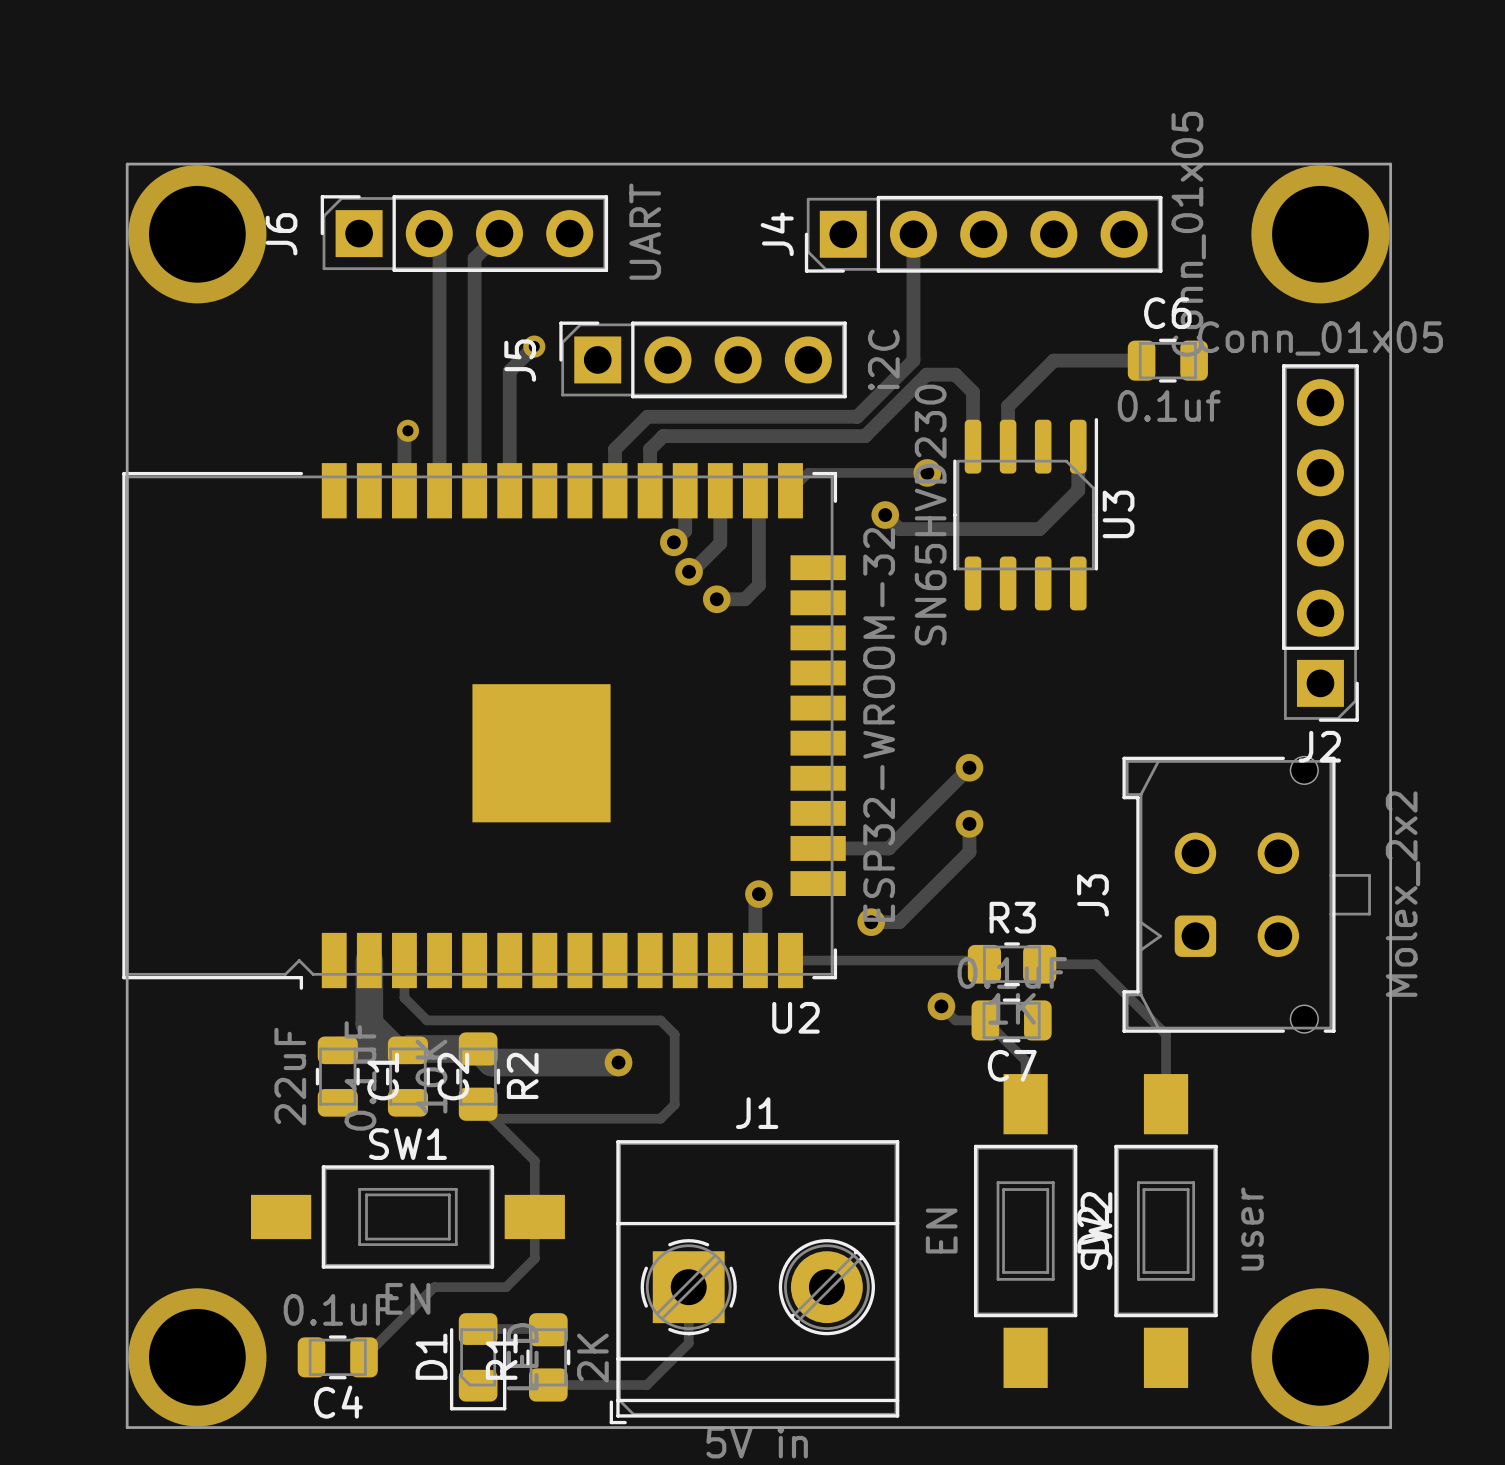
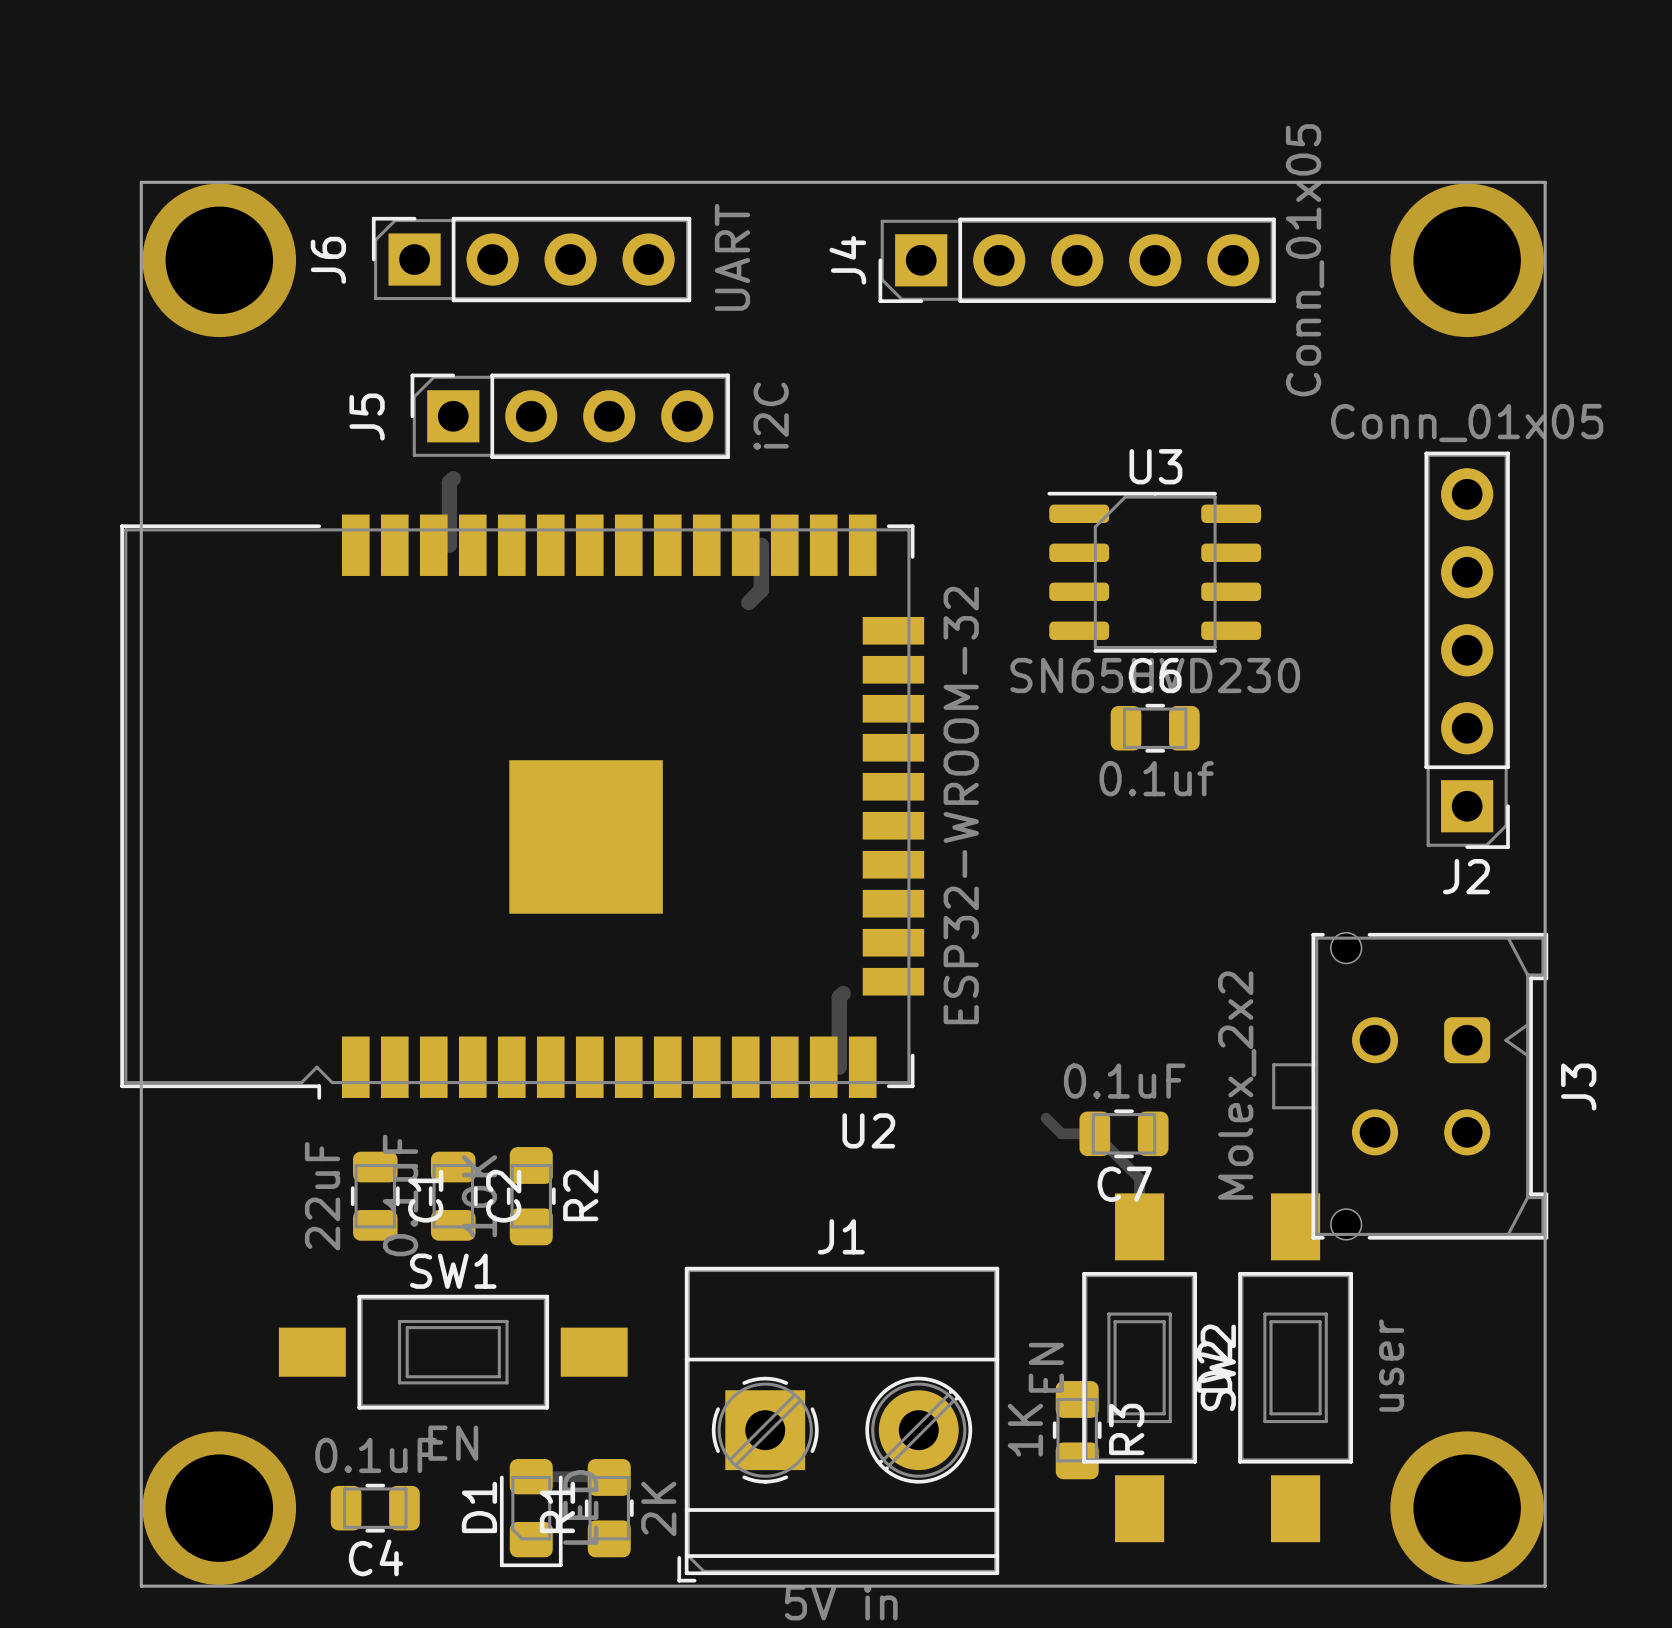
track: (429, 233) (439, 243) (439, 490) -> none
J6 position: (464, 233) -> (531, 259)
track: (499, 233) (474, 258) (474, 490) -> none
track: (913, 234) (913, 360) (857, 416) (647, 416) (615, 449) (615, 490) -> none
J4 position: (983, 234) -> (1077, 260)
track: (534, 346) (509, 371) (509, 490) -> none
via: (534, 346) -> none
J5 position: (703, 359) -> (570, 416)
track: (1141, 360) (1053, 360) (1008, 406) (1008, 446) -> none
C6 position: (1167, 360) -> (1155, 728)
via: (407, 430) -> none
track: (973, 446) (973, 392) (955, 374) (926, 374) (865, 436) (663, 436) (650, 449) (650, 490) -> none
track: (1078, 446) (1078, 490) (1039, 529) (899, 529) (885, 515) -> none
track: (927, 472) (808, 472) (790, 490) -> none
via: (927, 472) -> none
track: (720, 490) (720, 543) (691, 571) (689, 571) -> none
track: (755, 490) (758, 494) (758, 585) (744, 599) (716, 599) -> none
U3 rotation: 0° (1025, 514) -> 90° counterclockwise (1154, 572)
via: (885, 515) -> none
via: (673, 542) -> none
J2 position: (1320, 542) -> (1467, 650)
via: (689, 571) -> none
via: (716, 599) -> none
U2 position: (484, 726) -> (522, 807)
track: (969, 767) (888, 848) (818, 848) -> none
via: (969, 767) -> none
track: (969, 823) (969, 851) (899, 922) (871, 922) -> none
via: (969, 823) -> none
via: (758, 894) -> none
J3 rotation: 0° (1246, 894) -> 180° (1410, 1086)
via: (871, 922) -> none
track: (369, 960) (369, 1023) (395, 1050) -> none
track: (404, 960) (404, 997) (427, 1020) (660, 1020) (674, 1034) (674, 1104) (660, 1118) (492, 1118) -> none
track: (790, 960) (980, 960) (984, 964) -> none
R3 rotation: 0° (1012, 964) -> 90° clockwise (1077, 1430)
R3 position: (1012, 964) -> (1077, 1430)
track: (1039, 964) (1095, 964) (1166, 1034) (1166, 1104) -> none
via: (941, 1006) -> none
track: (337, 1050) (478, 1048) (491, 1062) (618, 1062) -> none
via: (618, 1062) -> none
track: (478, 1104) (534, 1160) (534, 1258) (506, 1287) (434, 1287) (364, 1357) -> none
track: (688, 1287) (688, 1343) (647, 1384) (548, 1384) -> none

